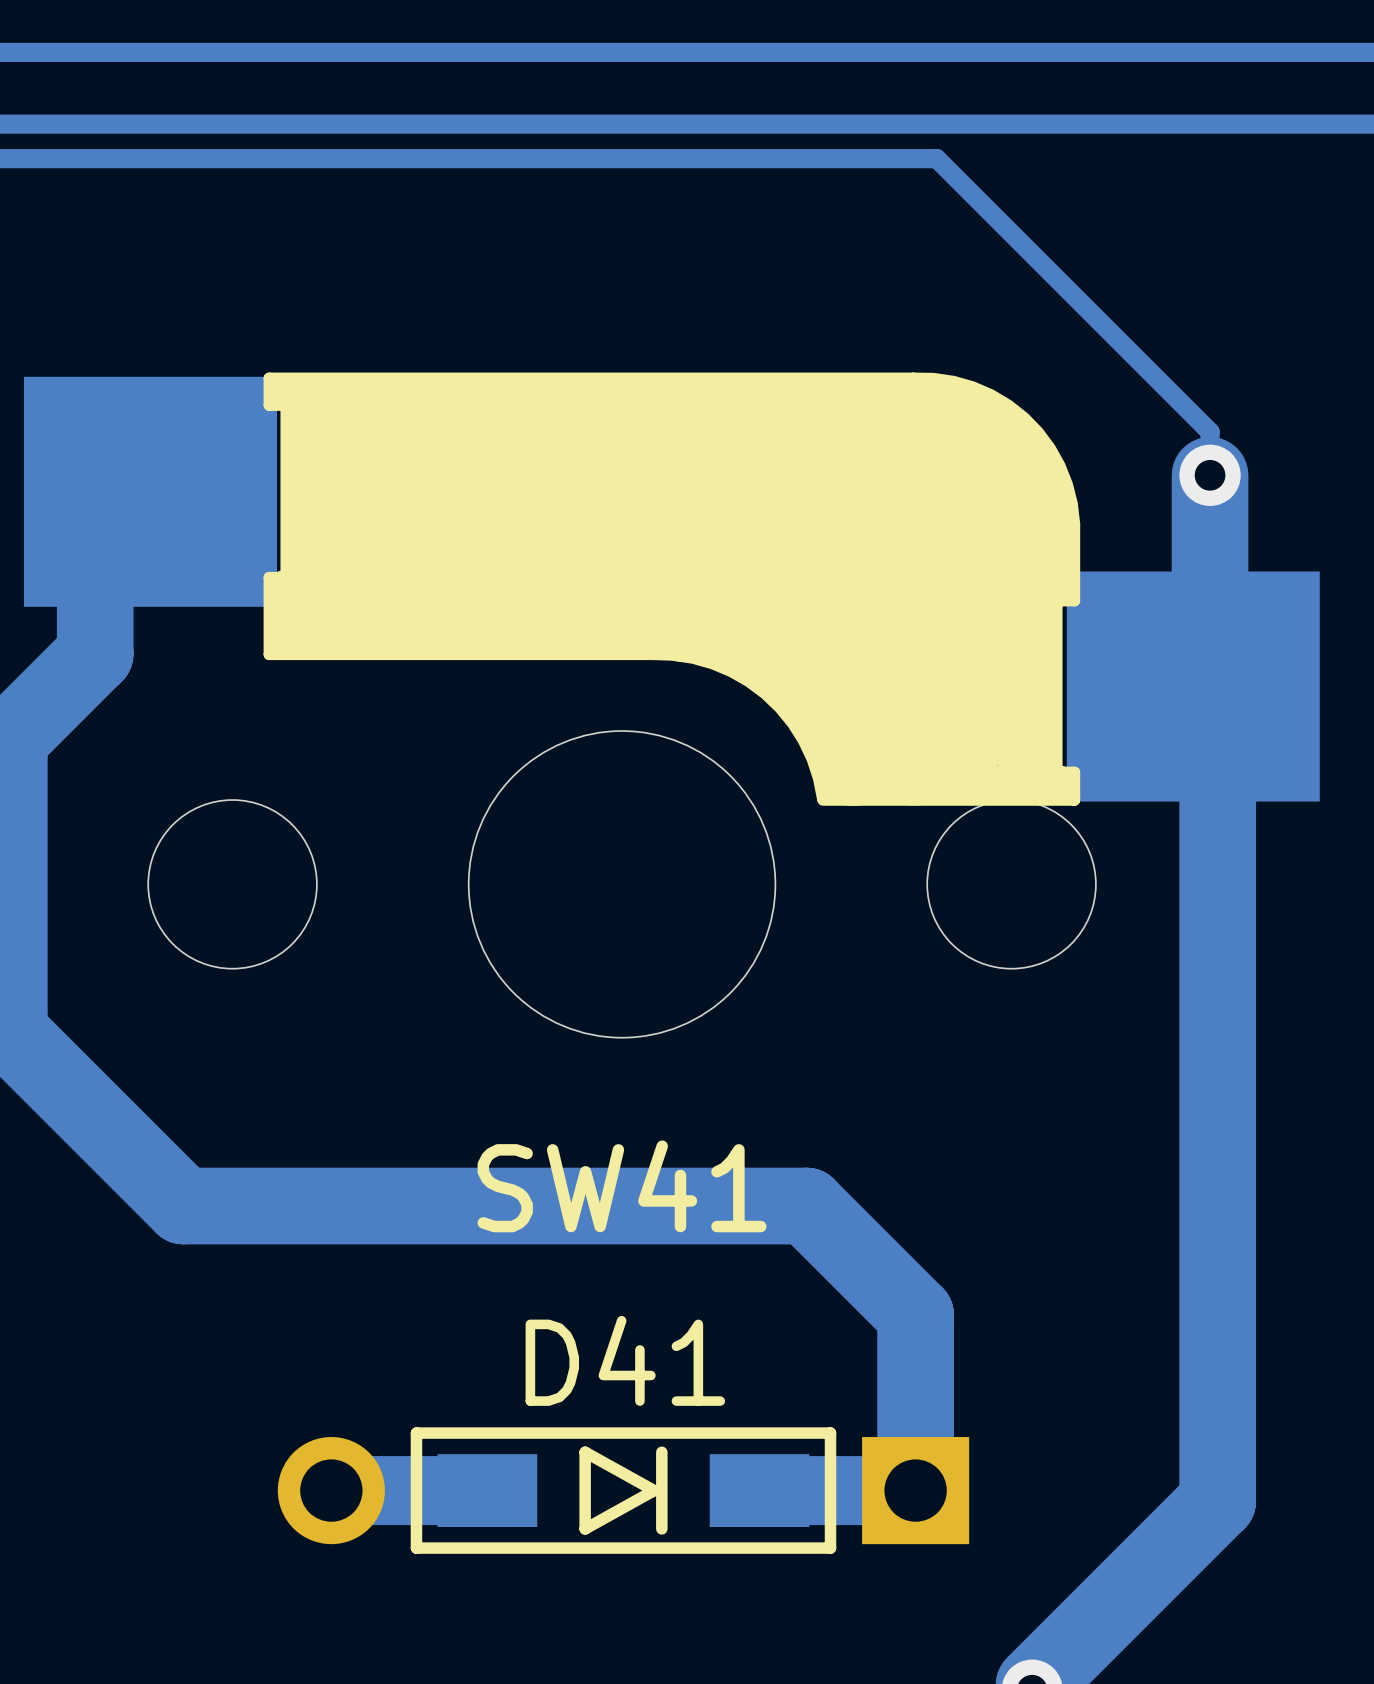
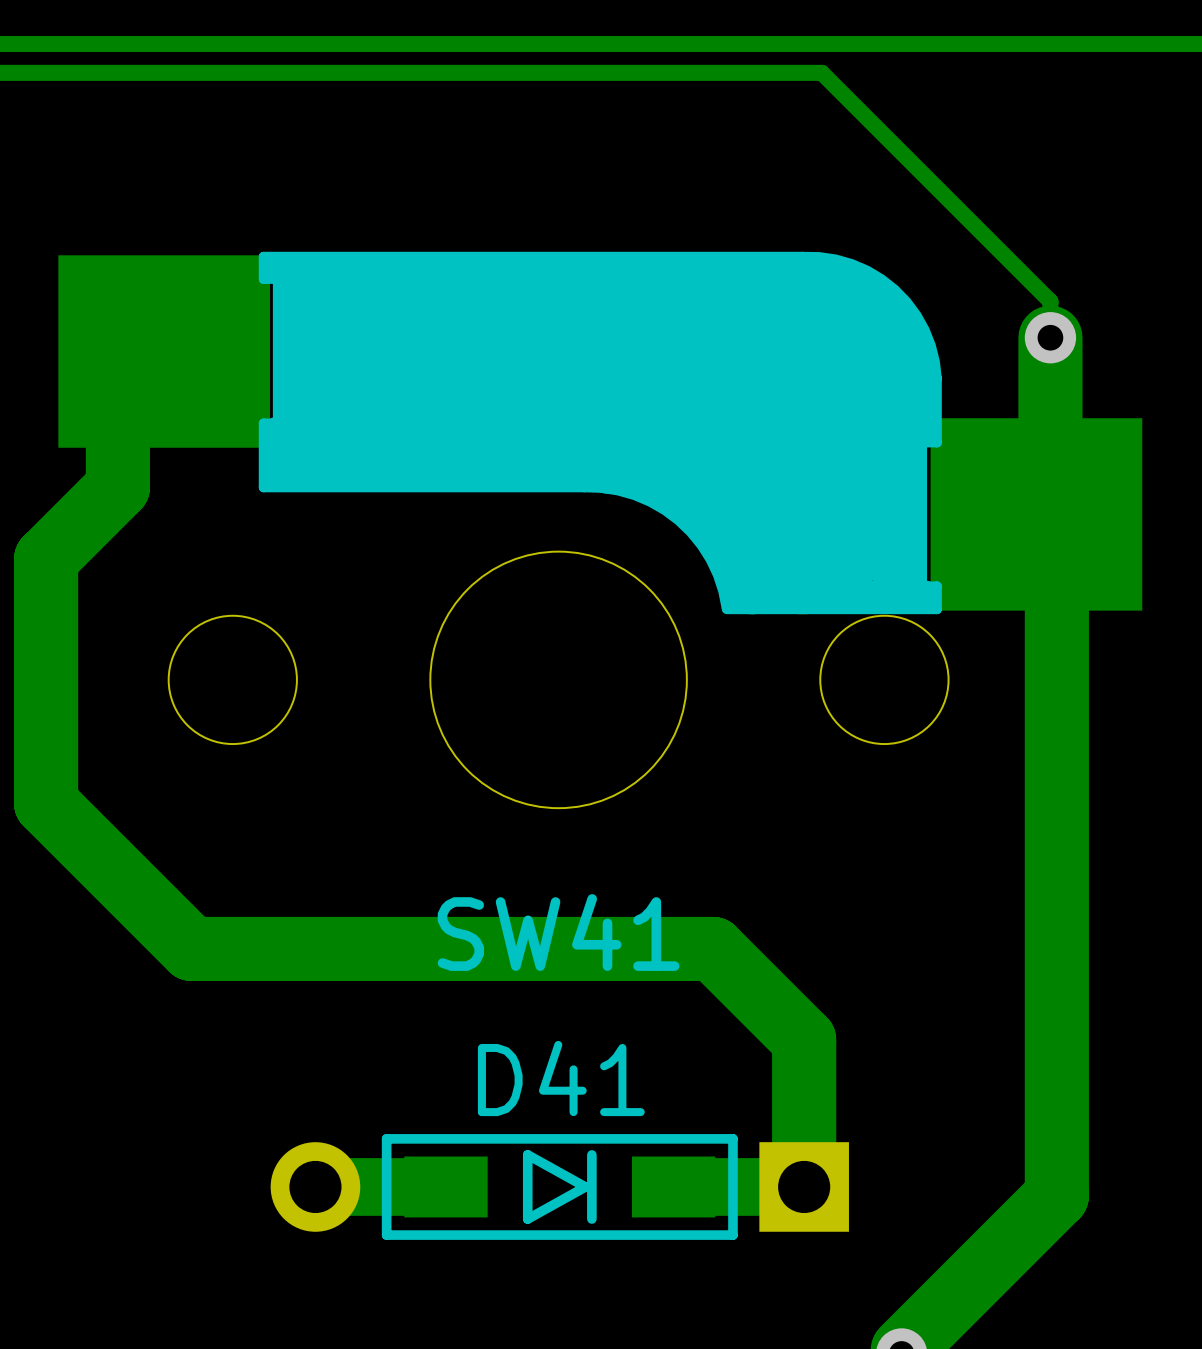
SW41 footprint: [23, 372, 1320, 1038] -> [58, 251, 1143, 809]

